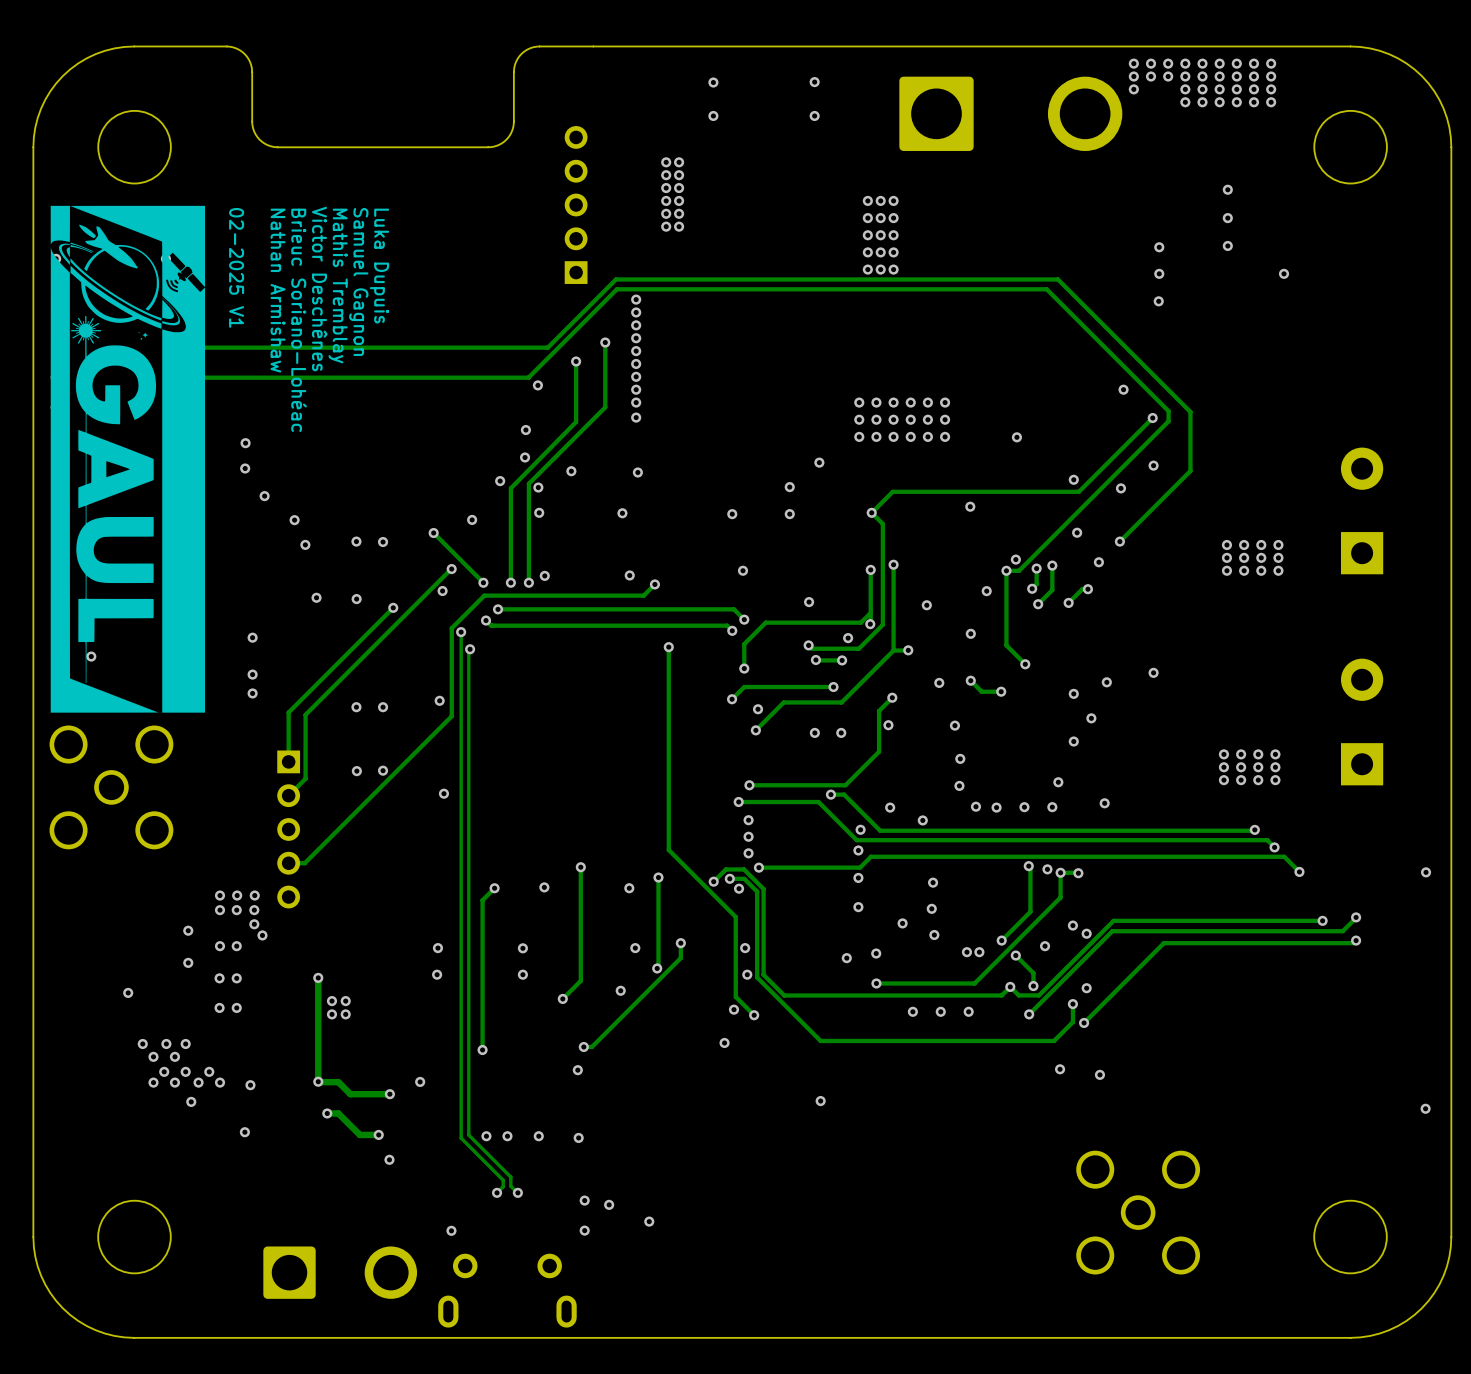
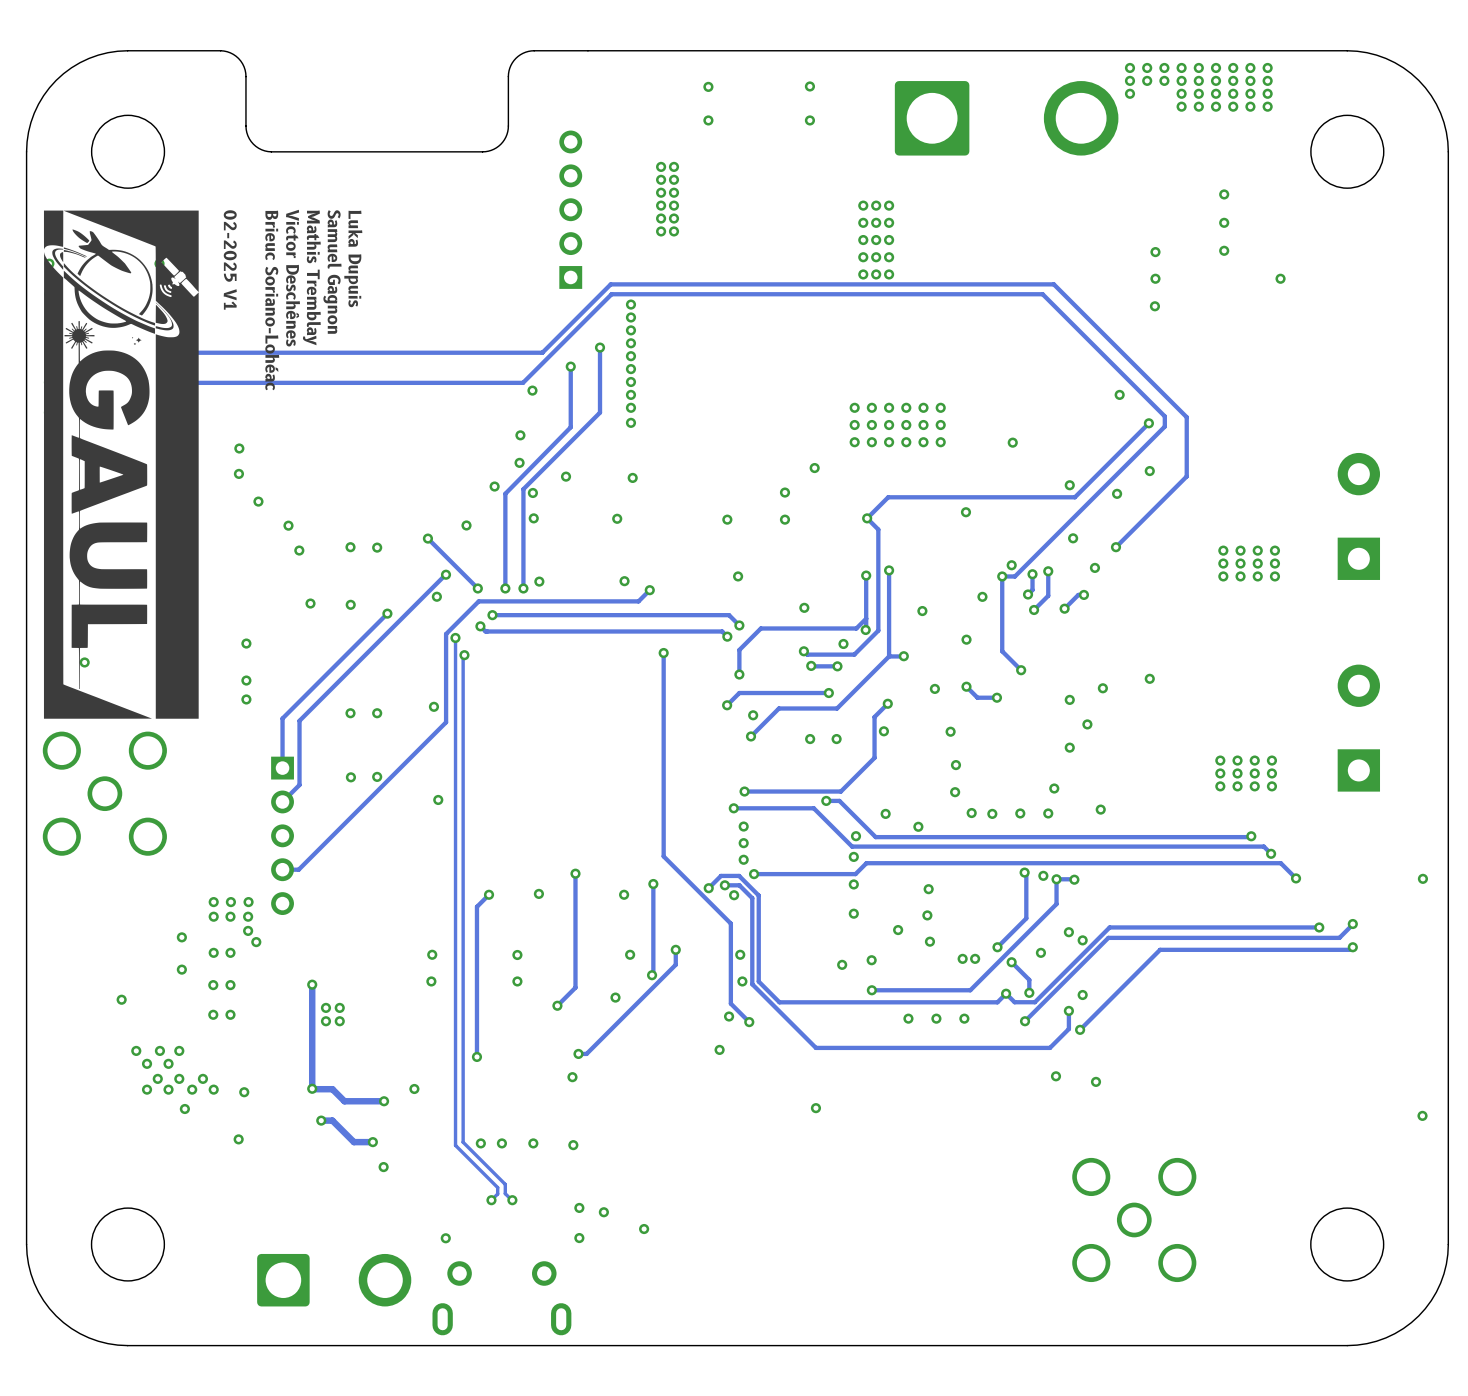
text: Luka Dupuis (379, 266) -> none
text: Samuel Gagnon (358, 282) -> Luka Dupuis (353, 258)
text: Mathis Tremblay (338, 286) -> Samuel Gagnon (332, 271)
text: Victor Deschênes (319, 289) -> Mathis Tremblay (311, 277)
text: Nathan Armishaw (278, 290) -> Brieuc Soriano-Lohéac (272, 300)
text: Brieuc Soriano-Lohéac (299, 320) -> Victor Deschênes (293, 278)

